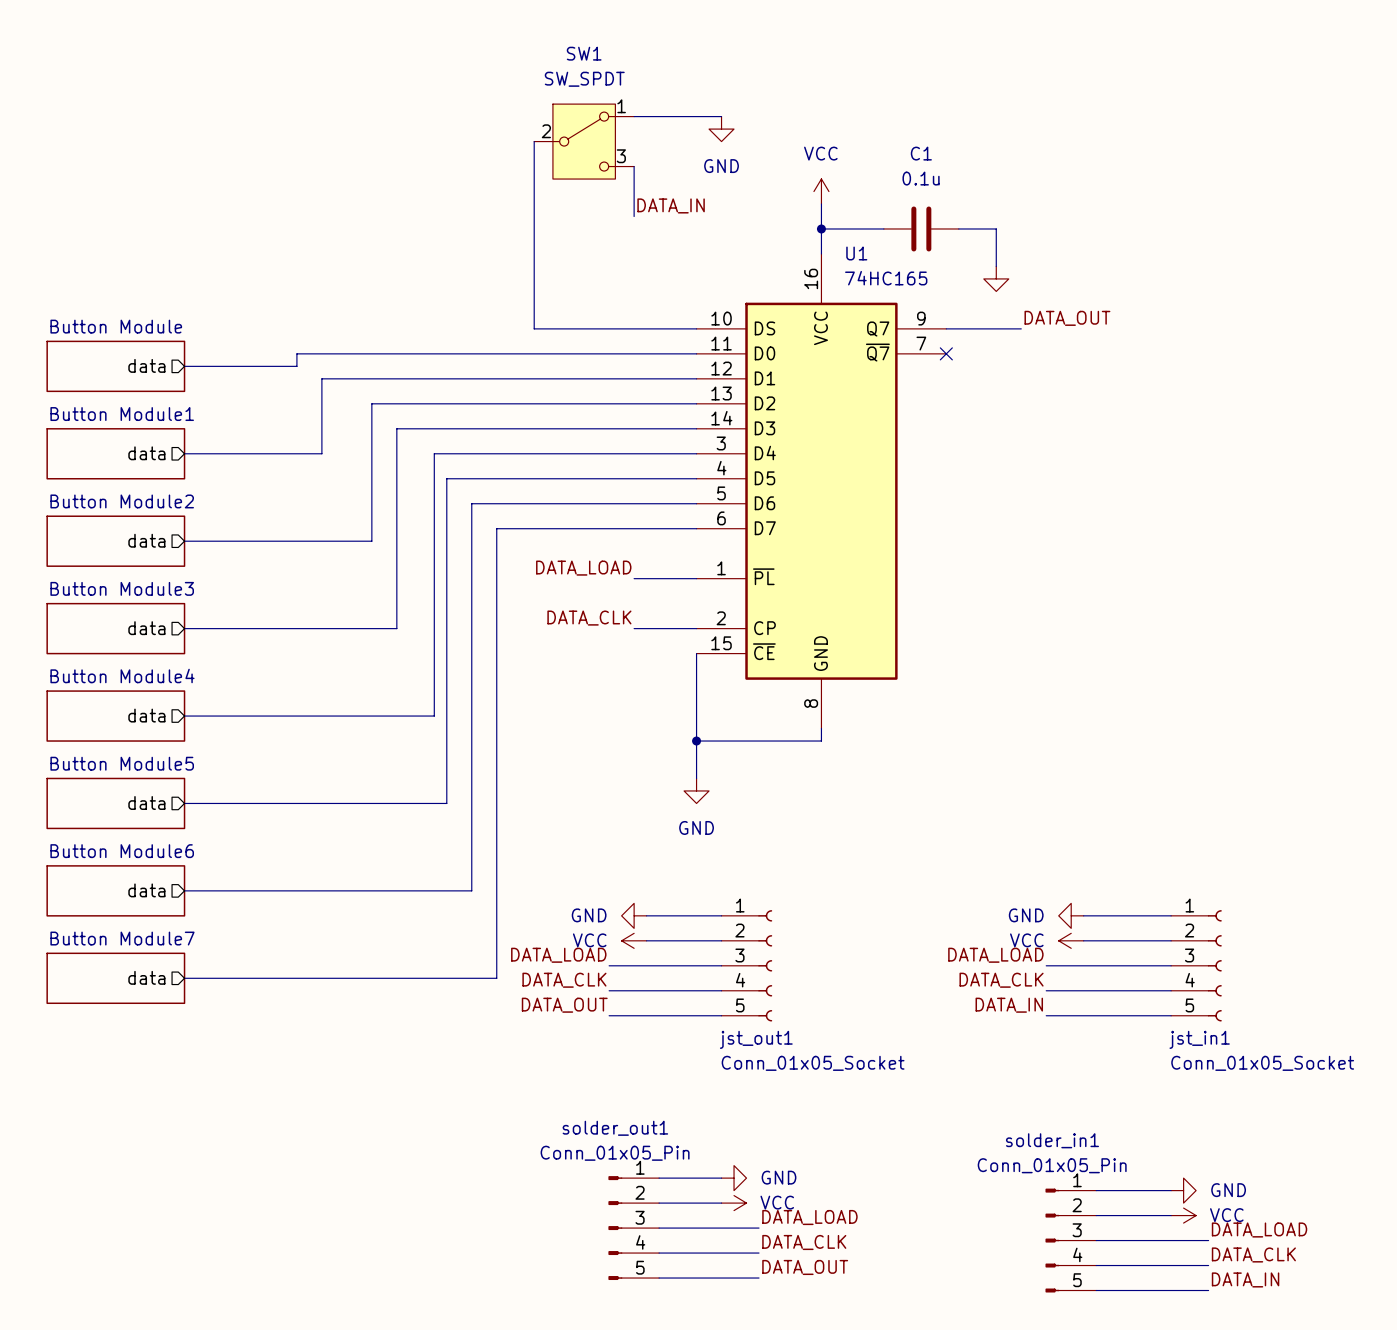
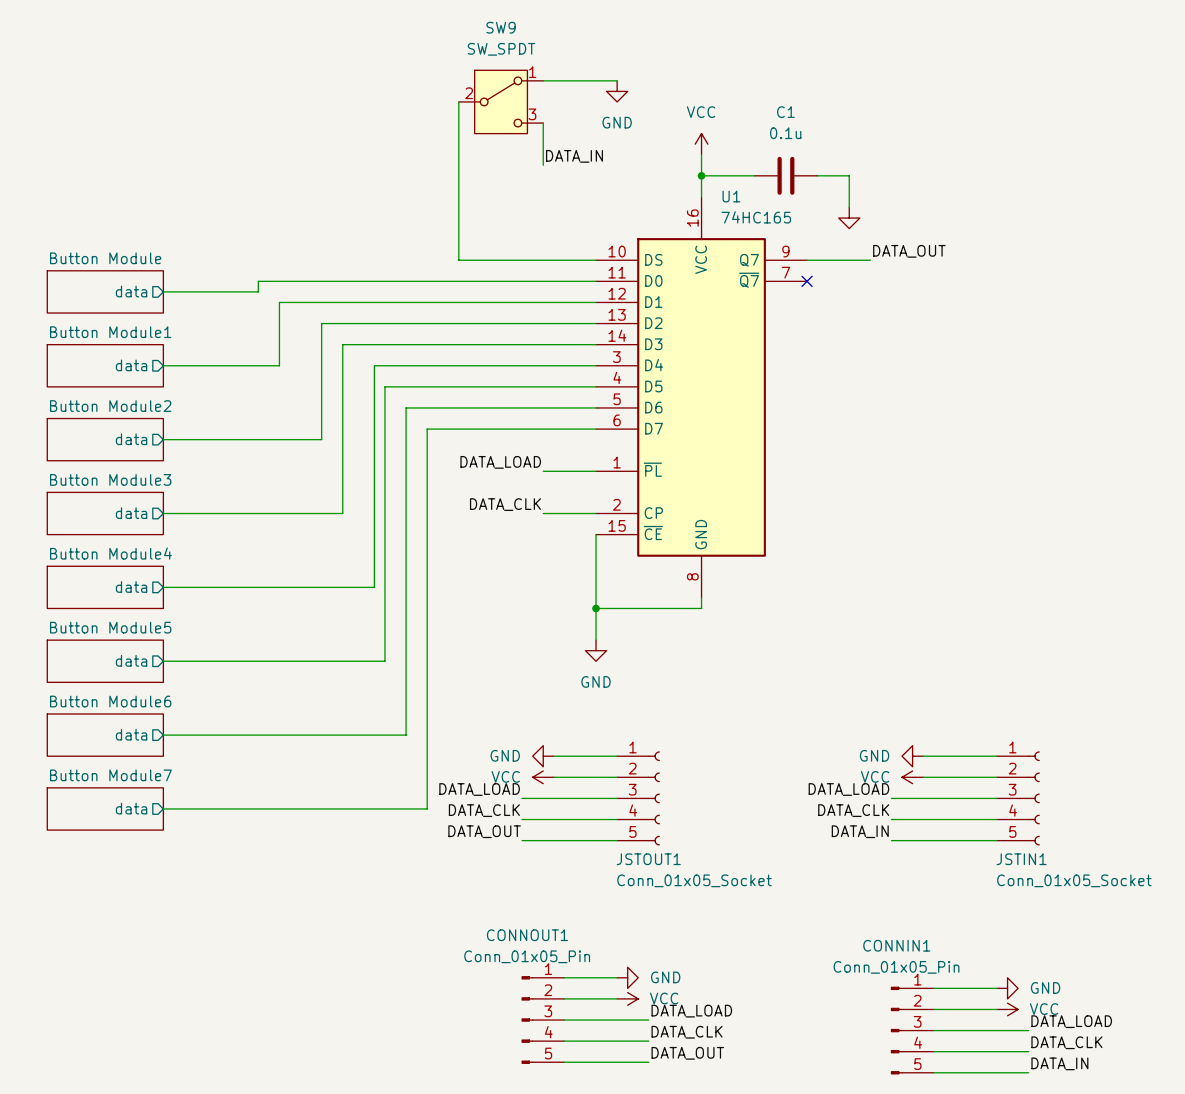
SW1 name: SW1 (584, 53) -> SW9 (501, 27)
jst_out1 name: jst_out1 (756, 1039) -> JSTOUT1 (648, 859)
jst_in1 name: jst_in1 (1199, 1039) -> JSTIN1 (1021, 859)
solder_out1 name: solder_out1 (615, 1128) -> CONNOUT1 (527, 935)
solder_in1 name: solder_in1 (1052, 1140) -> CONNIN1 (896, 945)

